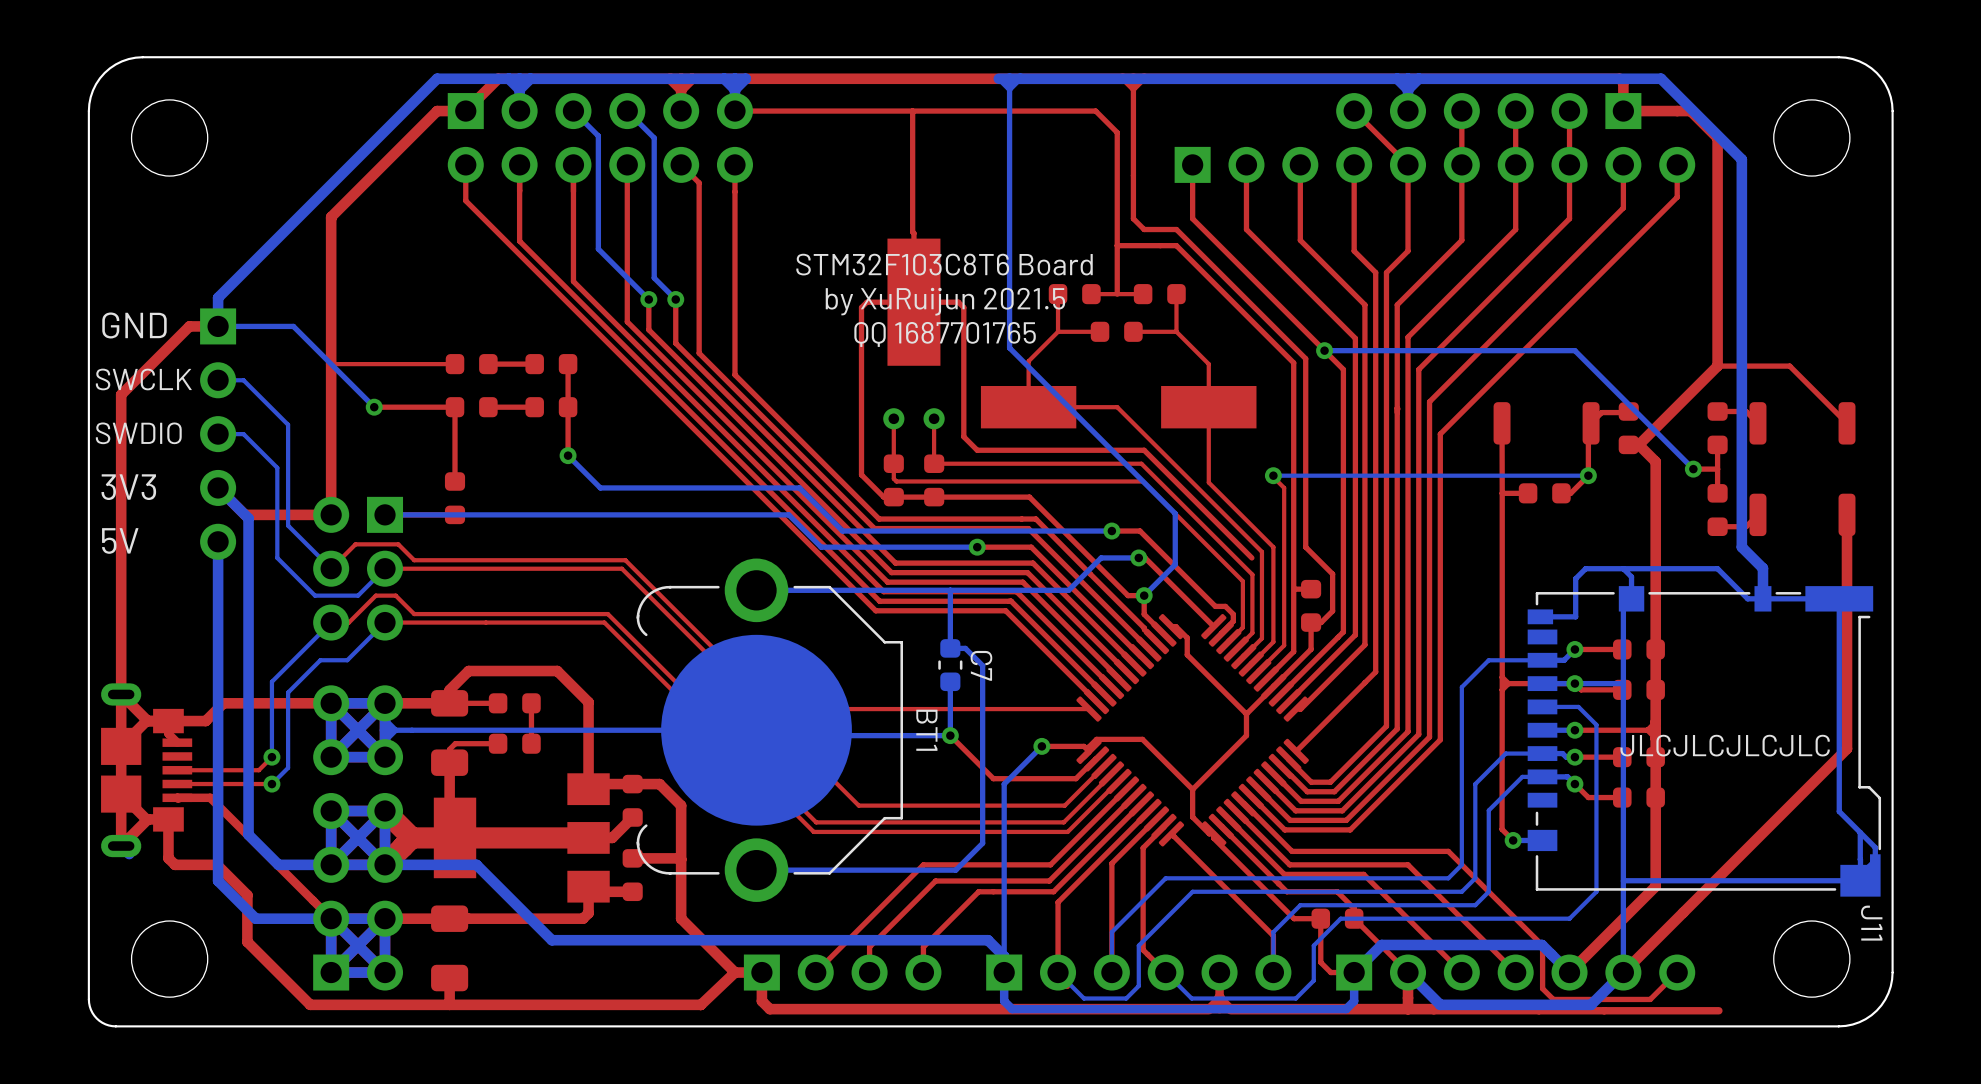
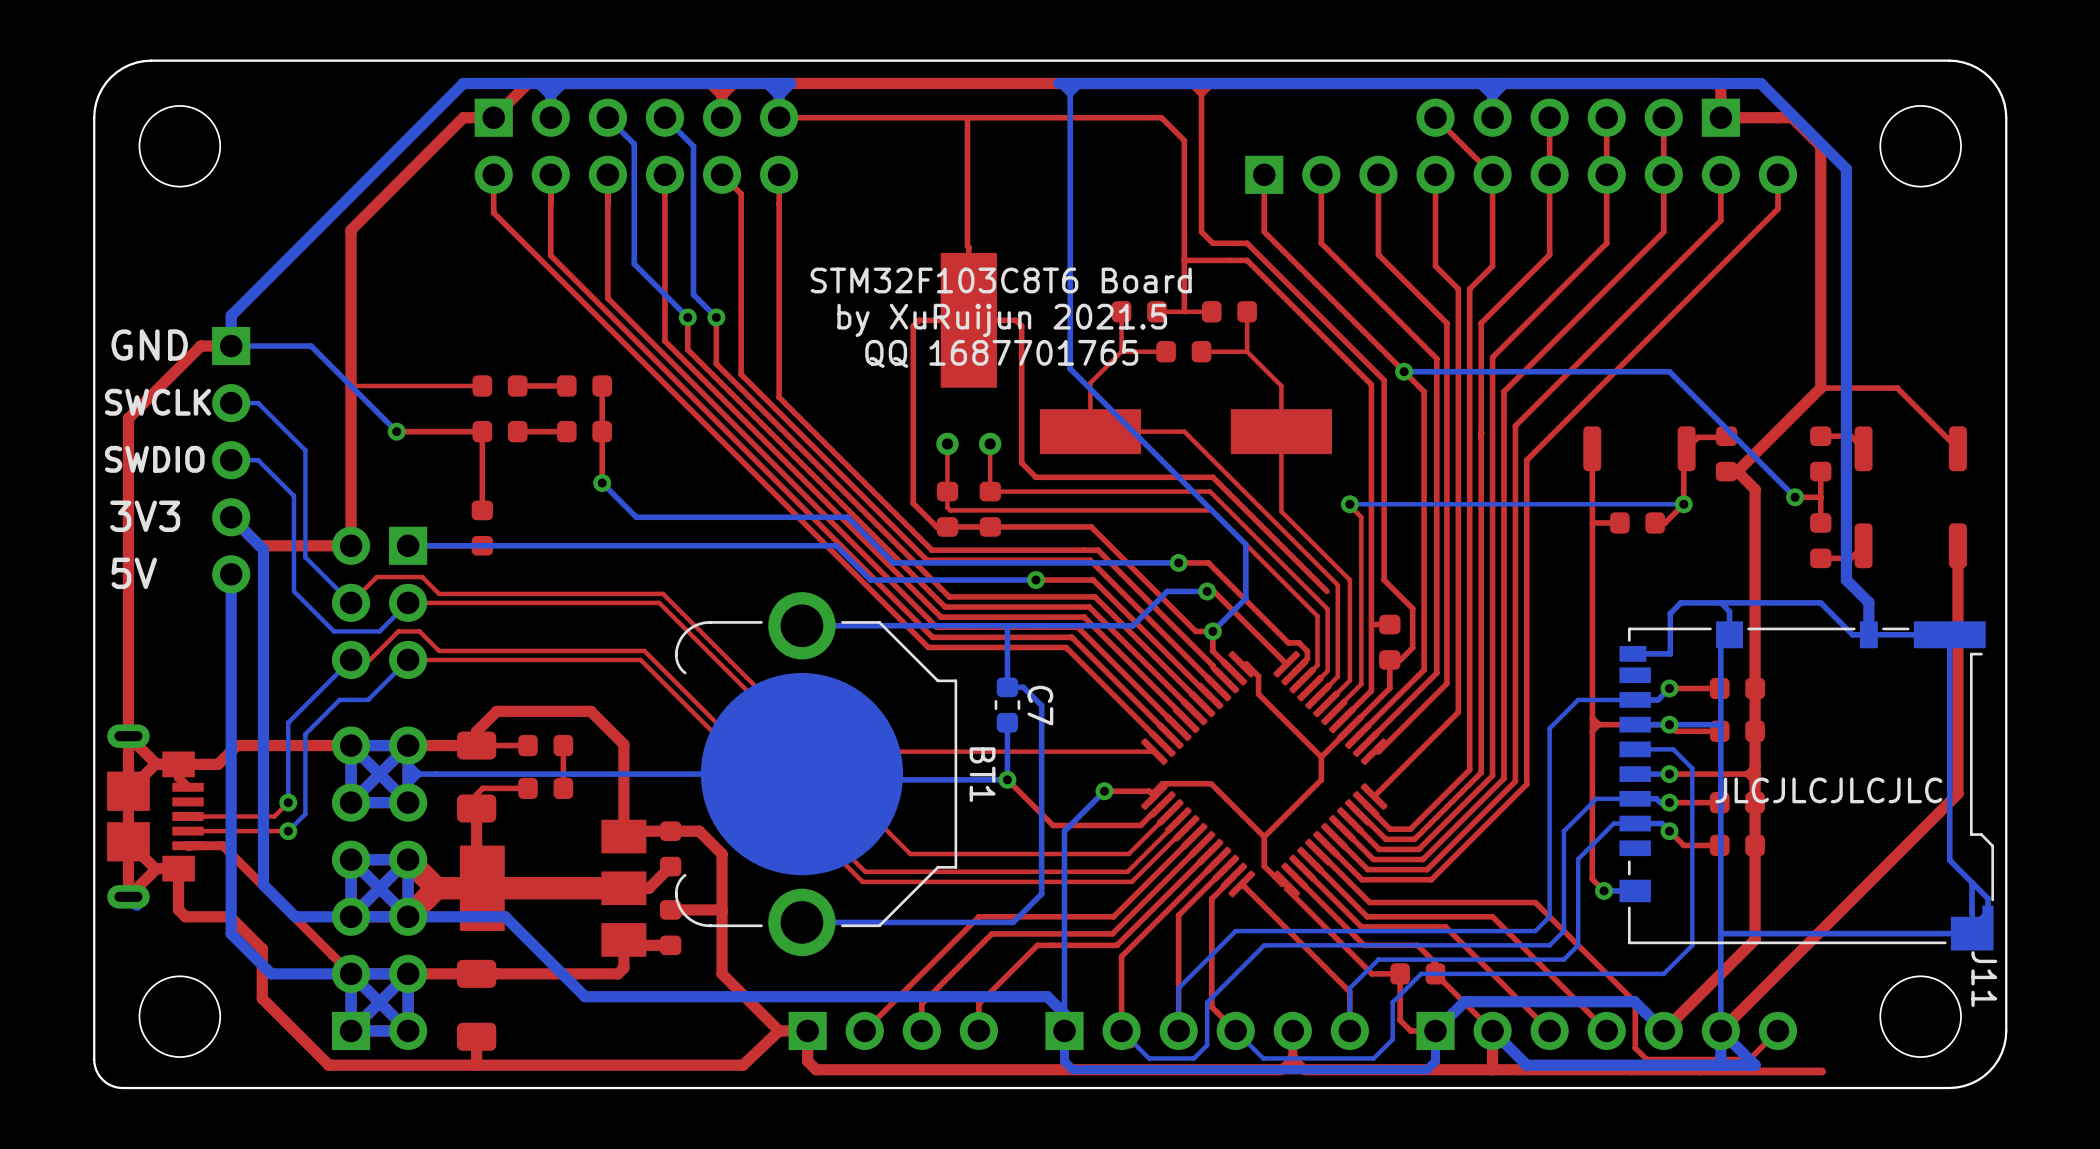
bottom track: (1623, 972) (1591, 1004) -> (1720, 1065) (1720, 1030) (1755, 1065) (1686, 1065)

